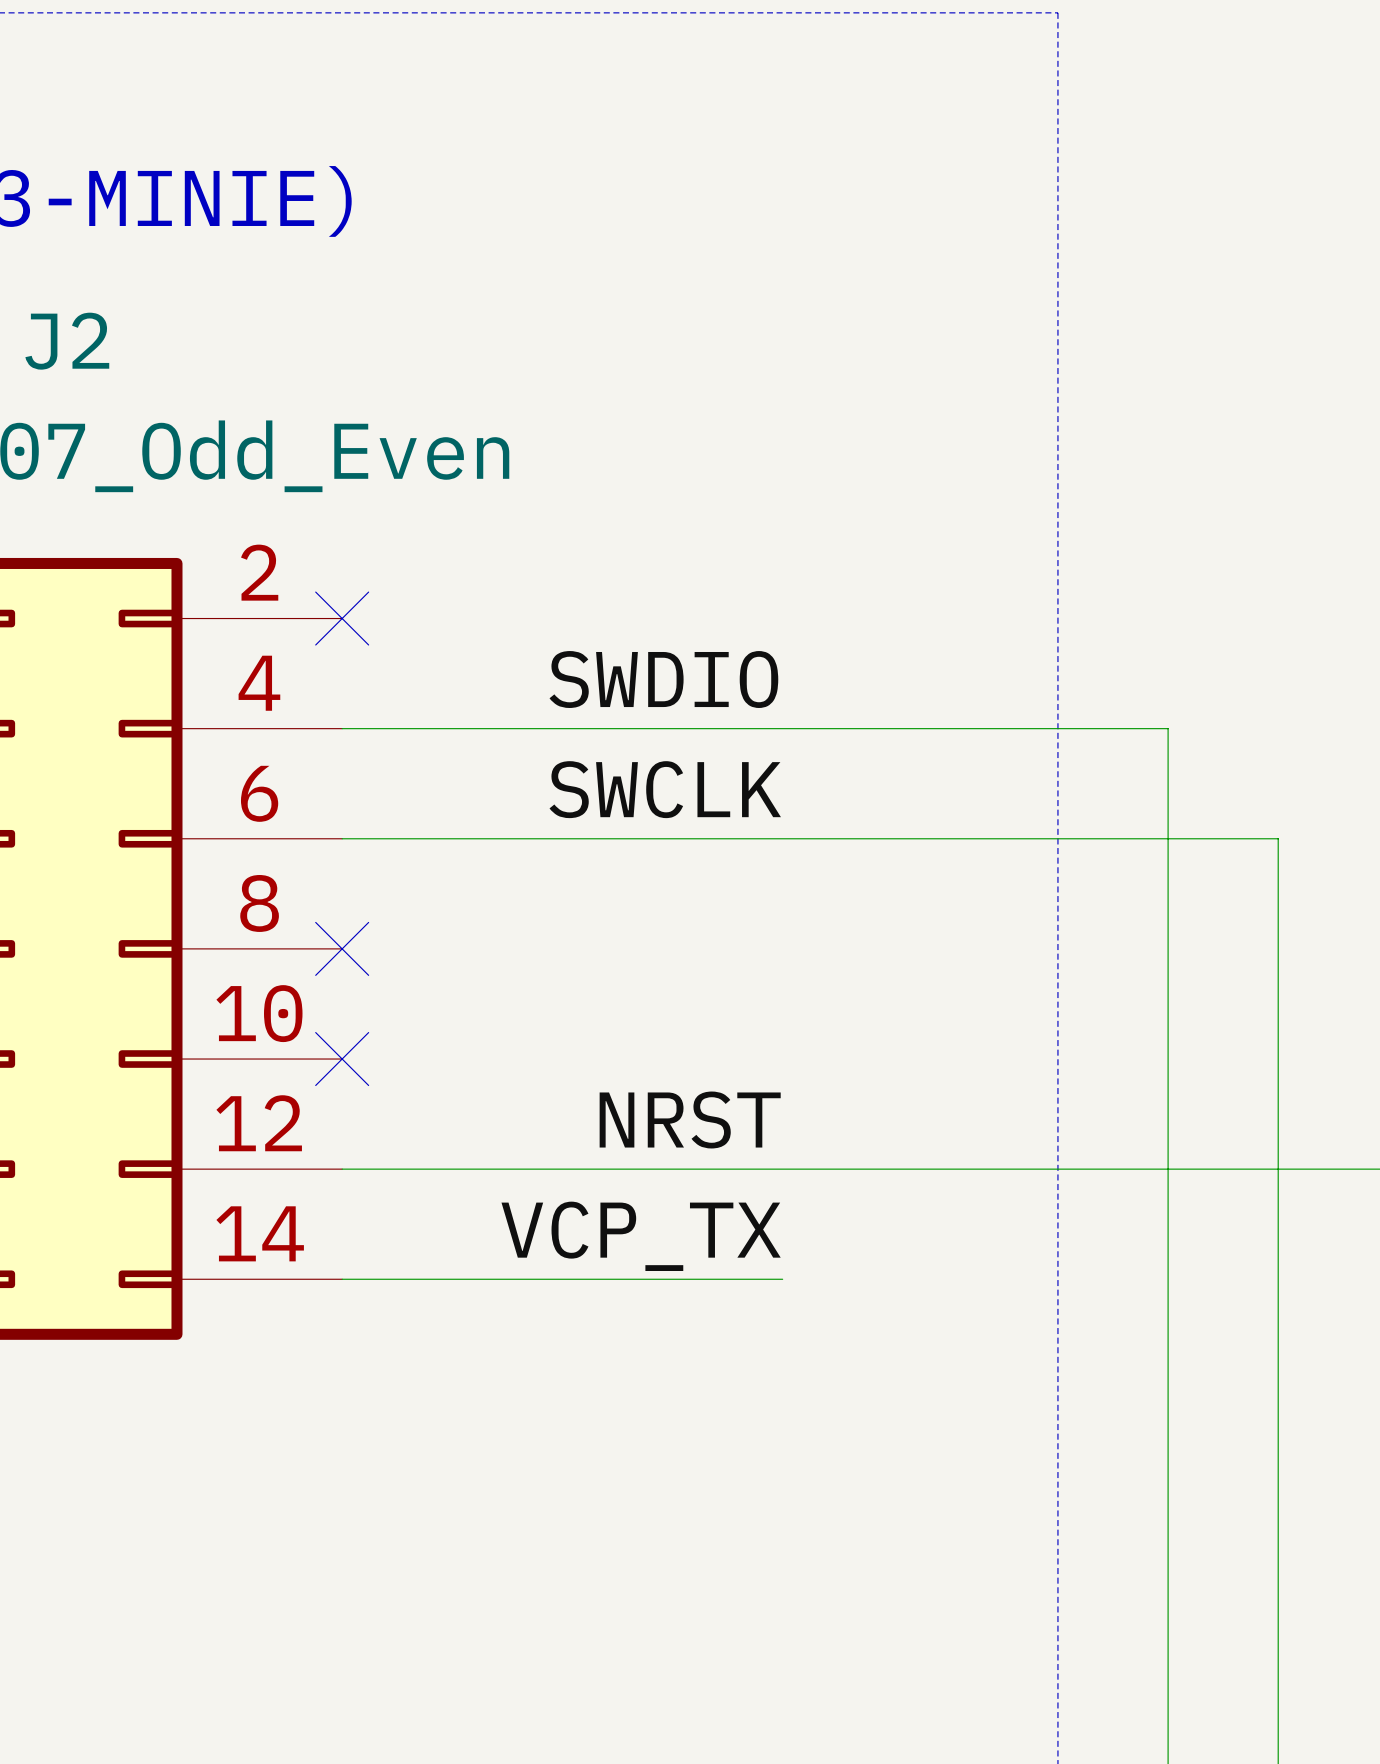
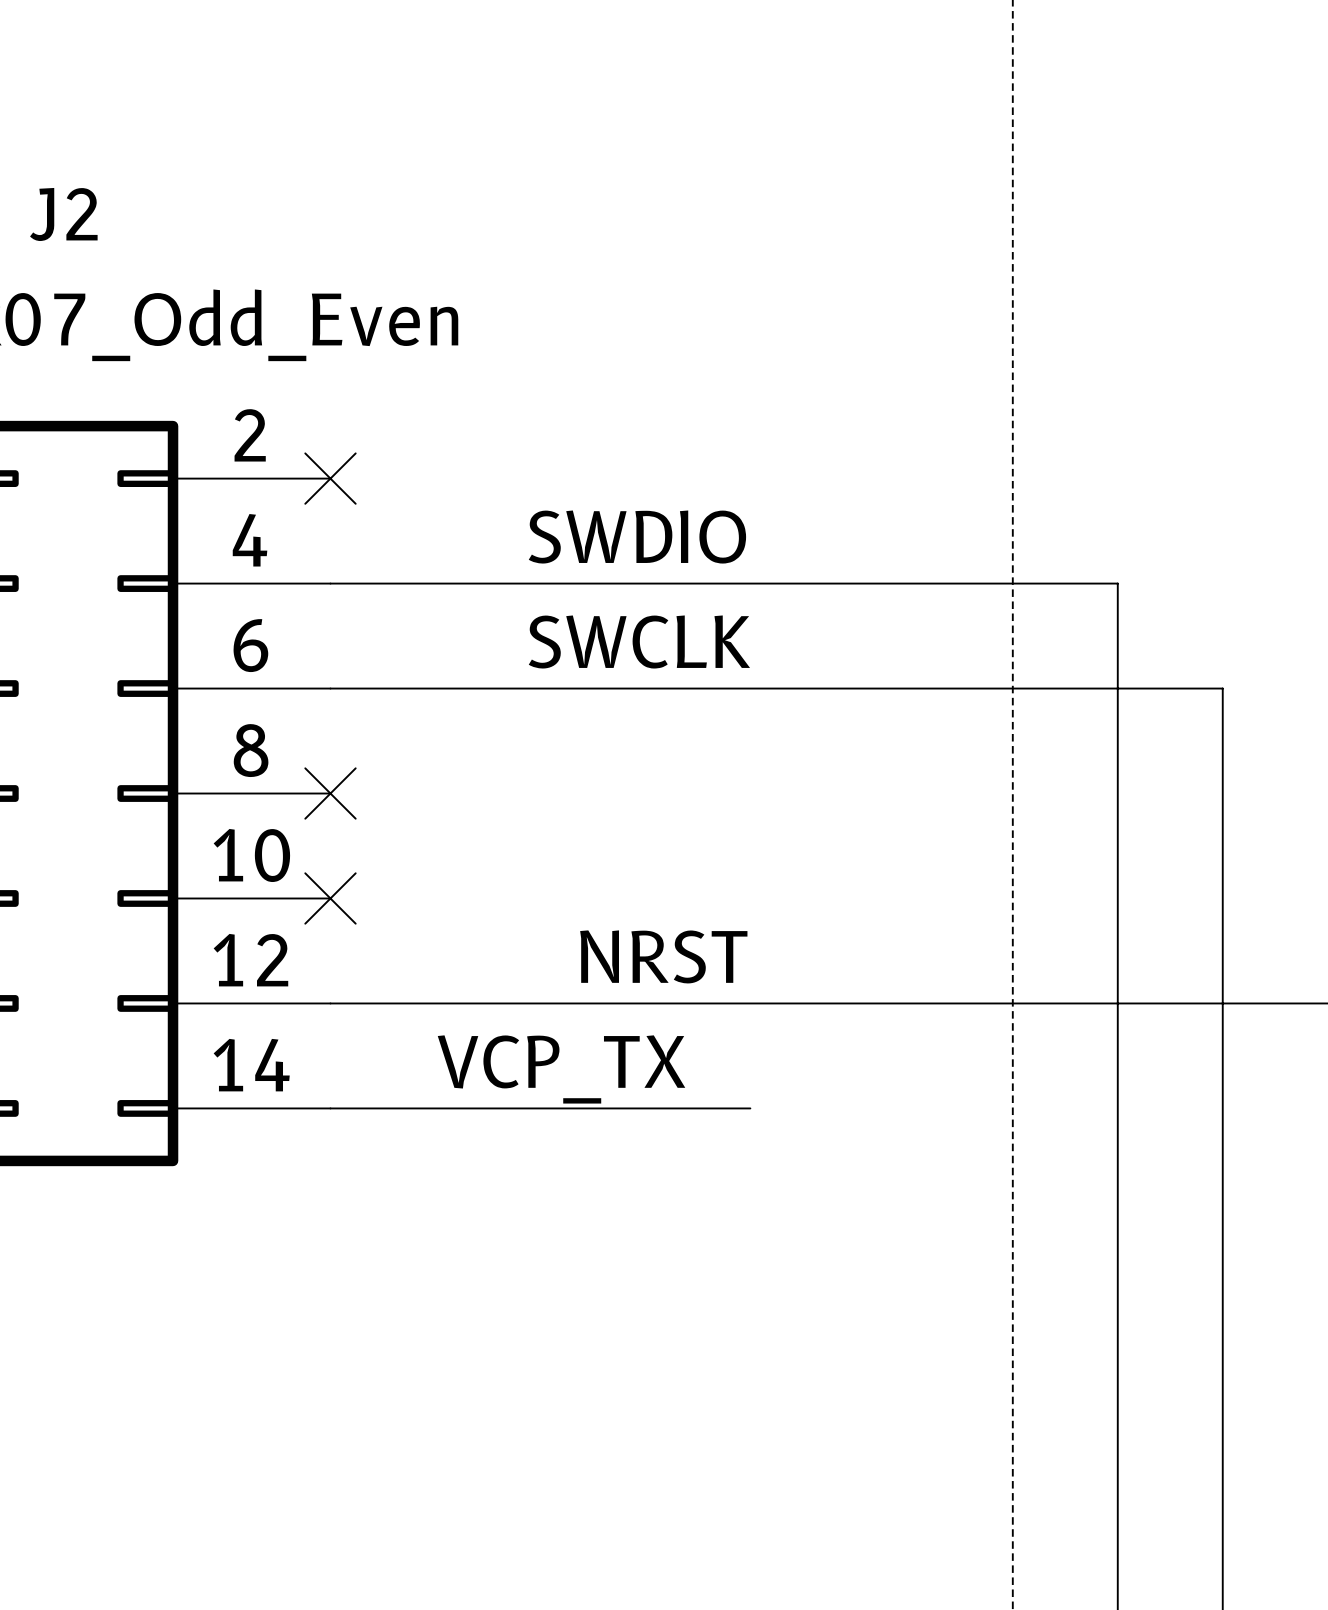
label position: VCP_TX (641, 1236) -> VCP_TX (561, 1069)

